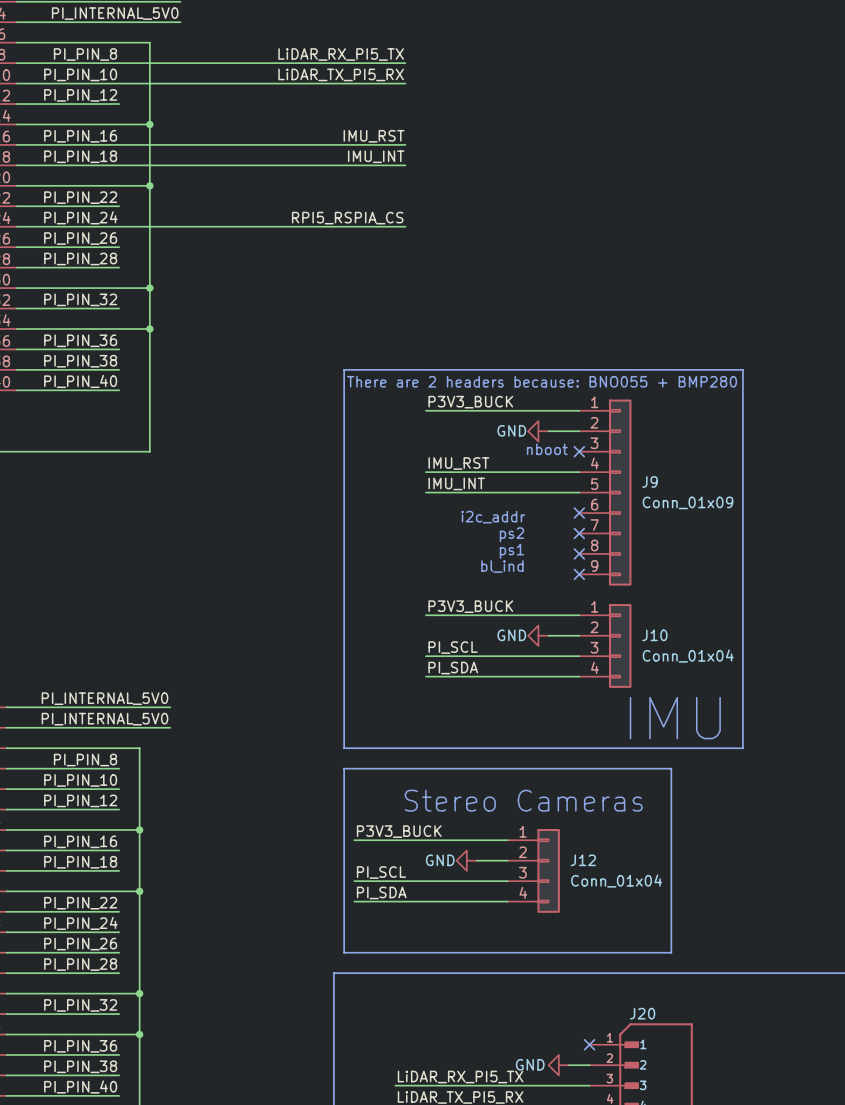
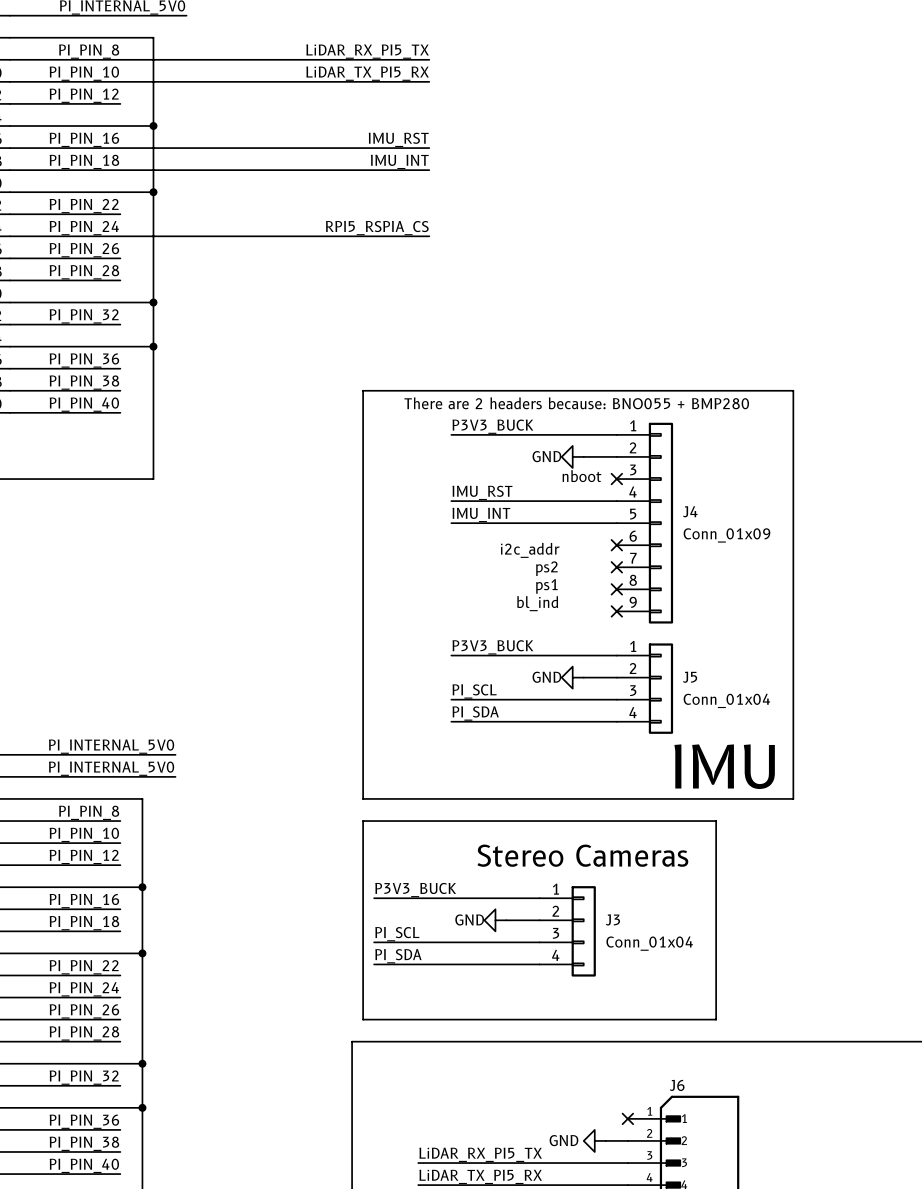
J9 name: J9 (650, 481) -> J4 (690, 511)
J10 name: J10 (654, 635) -> J5 (690, 677)
J12 name: J12 (583, 860) -> J3 (612, 919)
J20 name: J20 (642, 1013) -> J6 (677, 1085)

